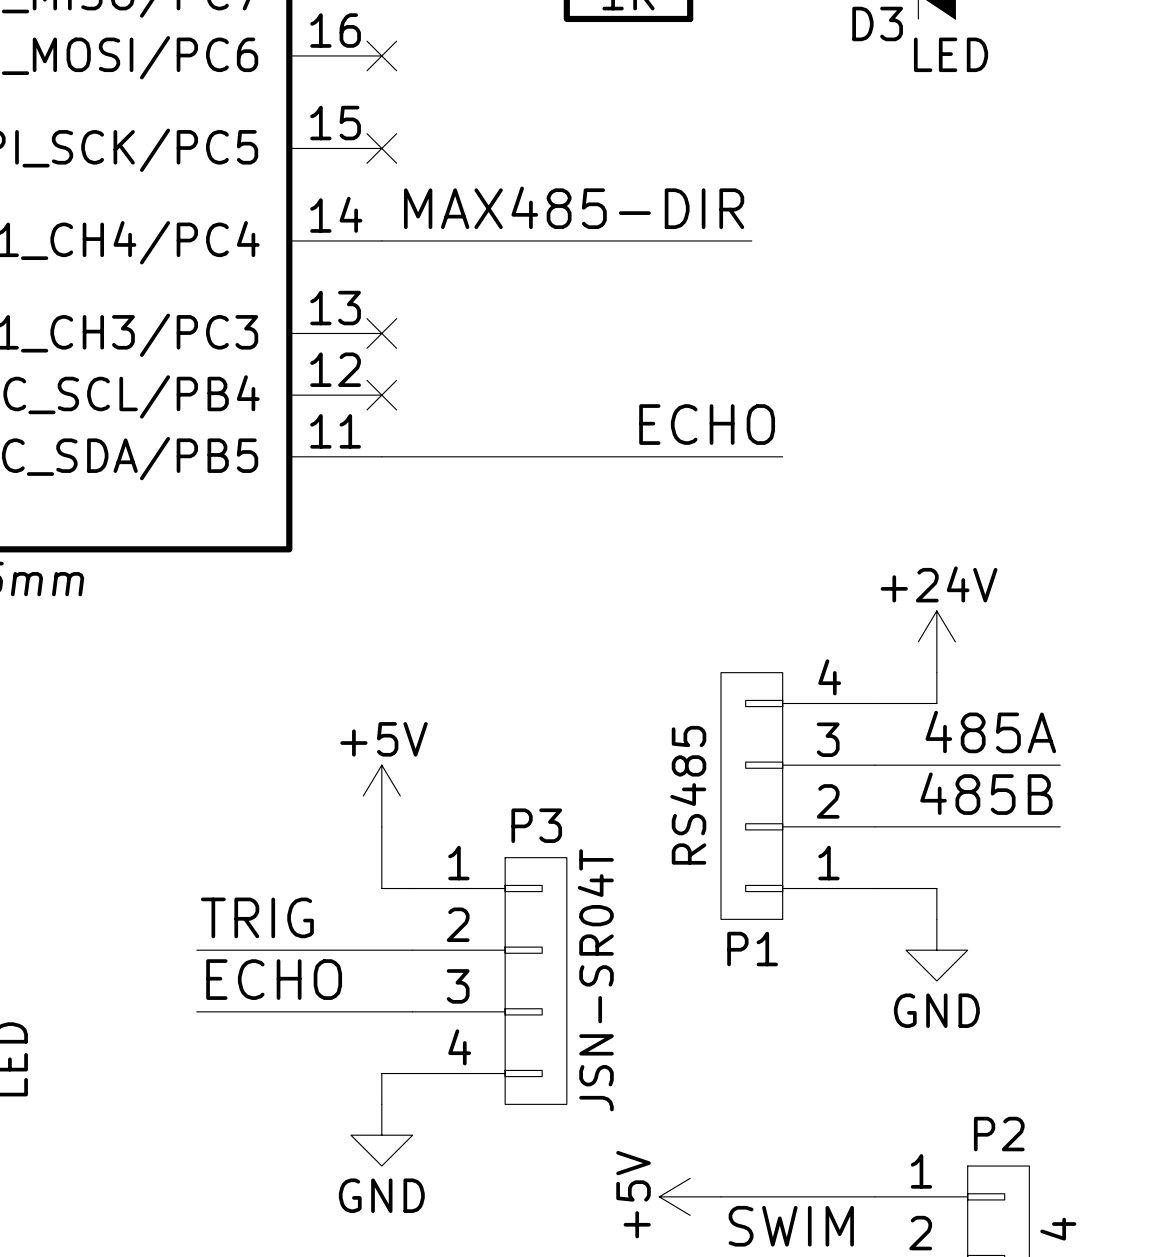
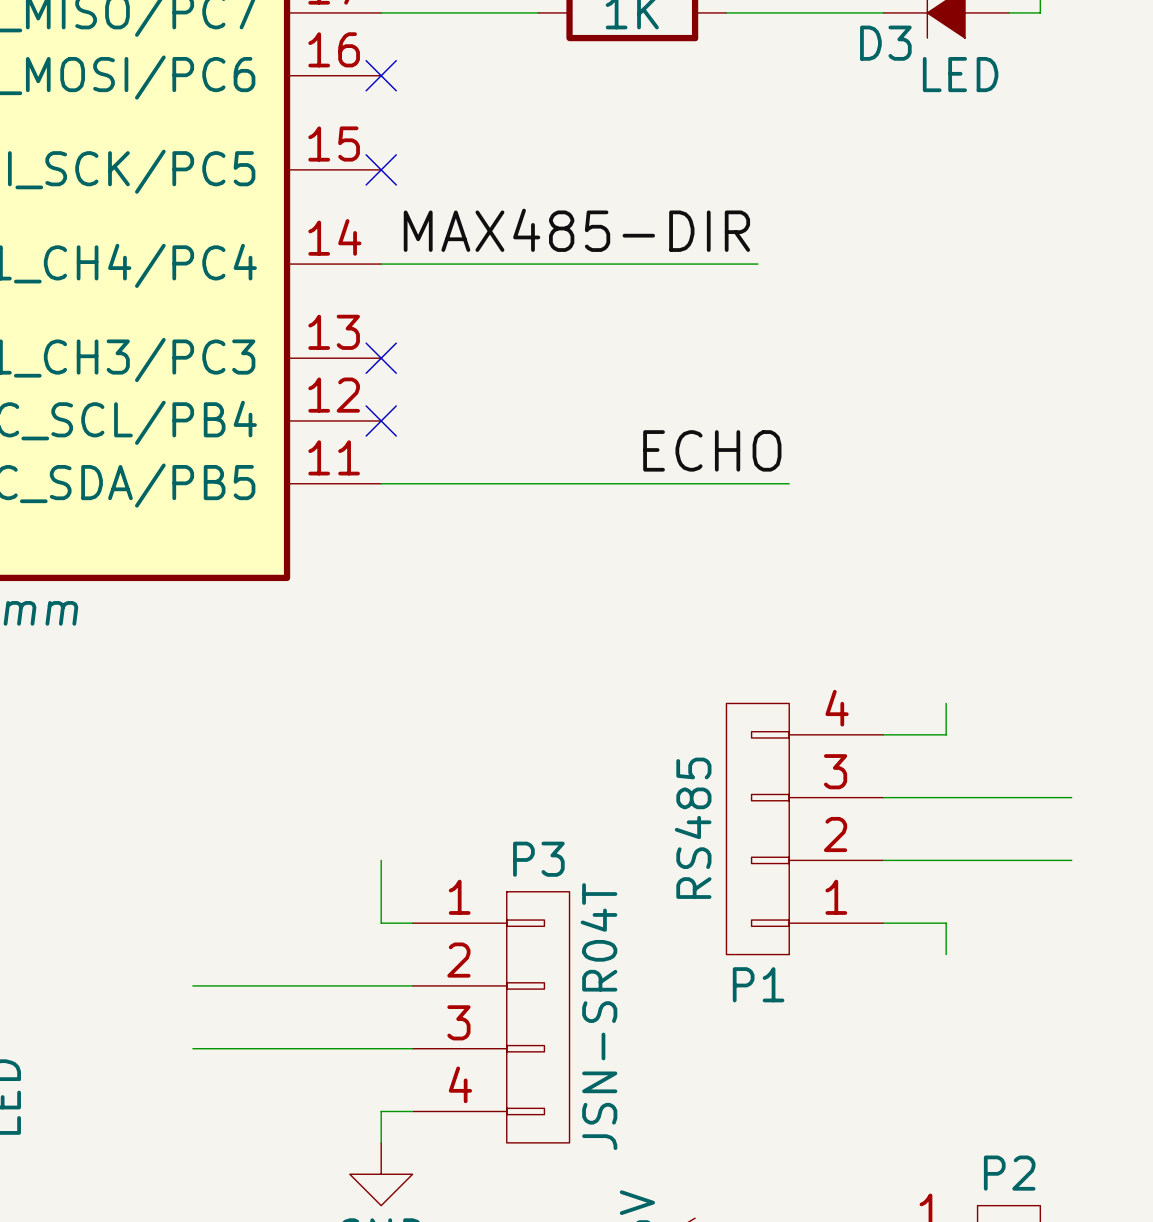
power symbol: +24V (936, 641) -> none
label: 485A (990, 732) -> none
label: 485B (986, 793) -> none
power symbol: +5V (381, 796) -> none
label: TRIG (257, 917) -> none
power symbol: GND (936, 950) -> none
label: ECHO (274, 979) -> none

